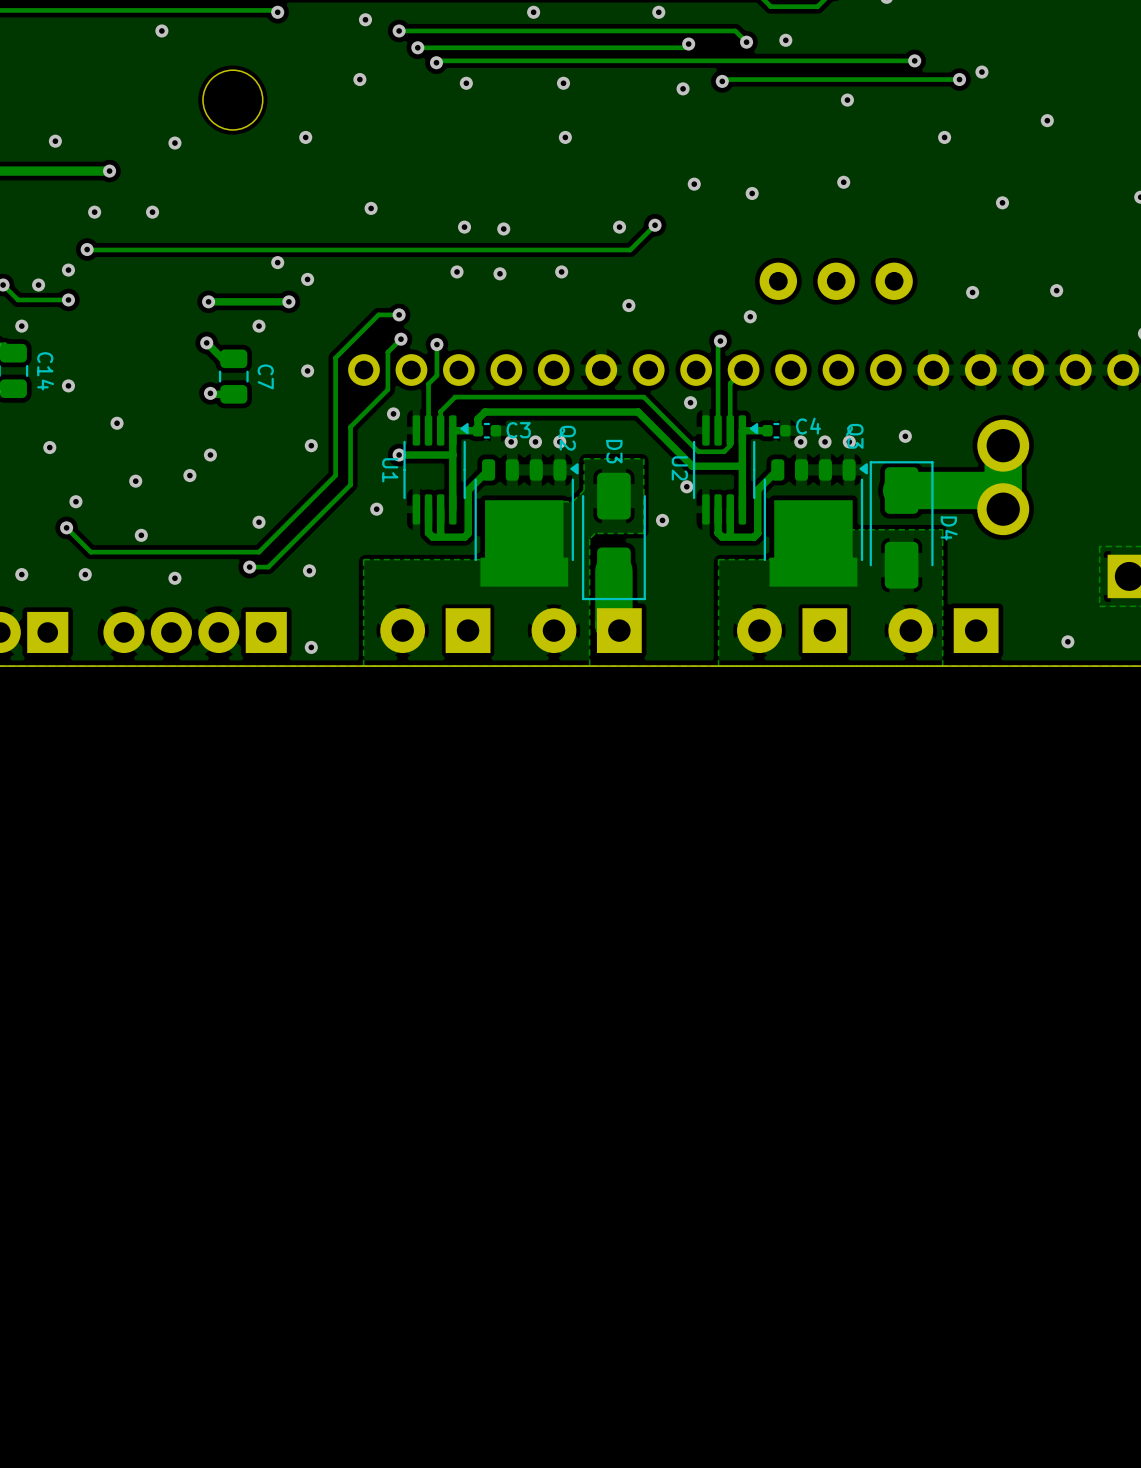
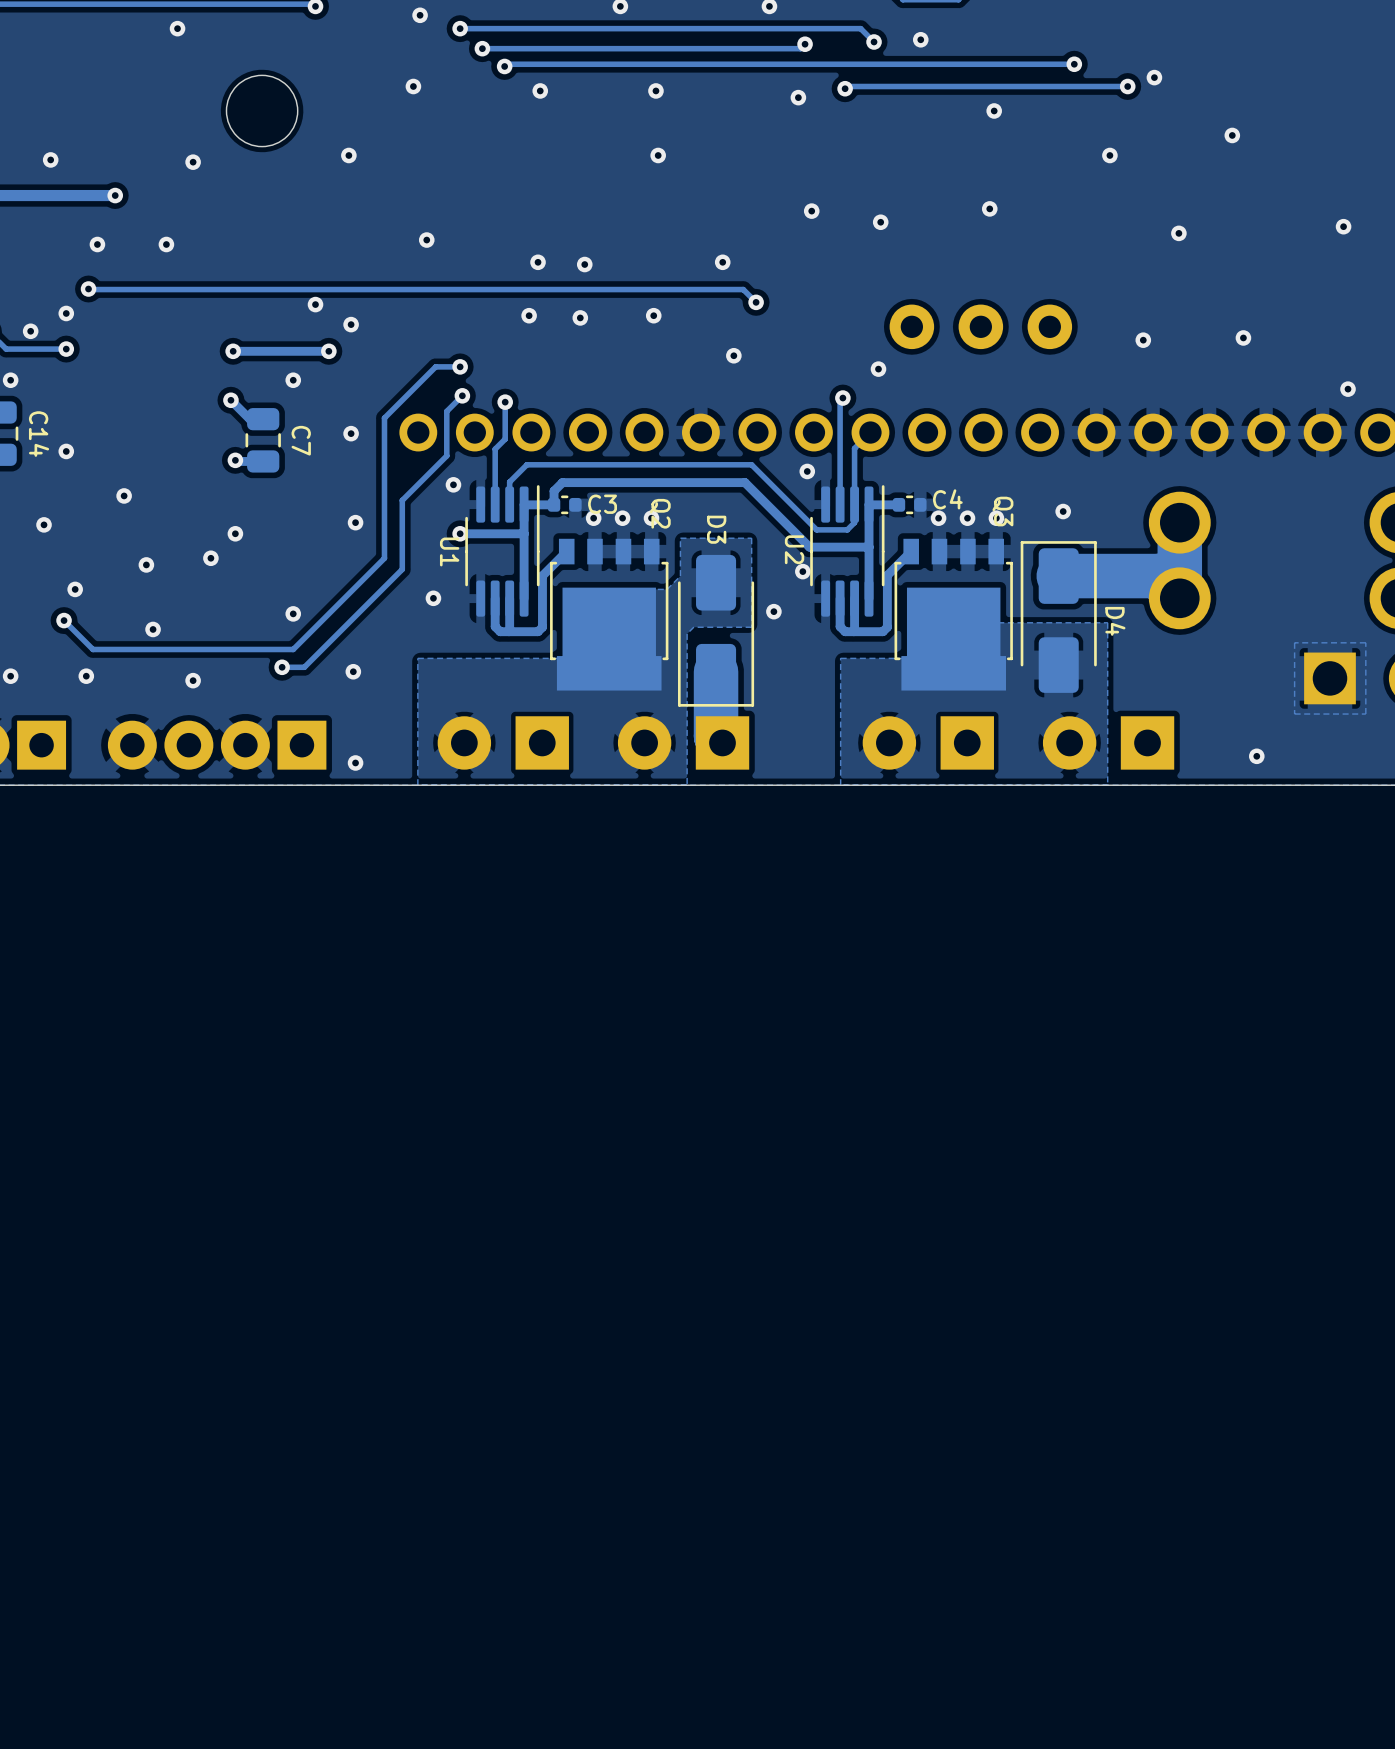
track: (655, 225) (630, 249) -> (756, 302) (743, 289) (735, 289)
via position: (655, 225) -> (756, 302)
U1 footprint: [403, 415, 469, 525] -> [465, 485, 540, 617]
U2 footprint: [692, 415, 759, 525] -> [810, 485, 885, 617]
Q2 footprint: [474, 459, 579, 587] -> [550, 538, 669, 691]
Q3 footprint: [763, 459, 868, 587] -> [894, 538, 1013, 691]

